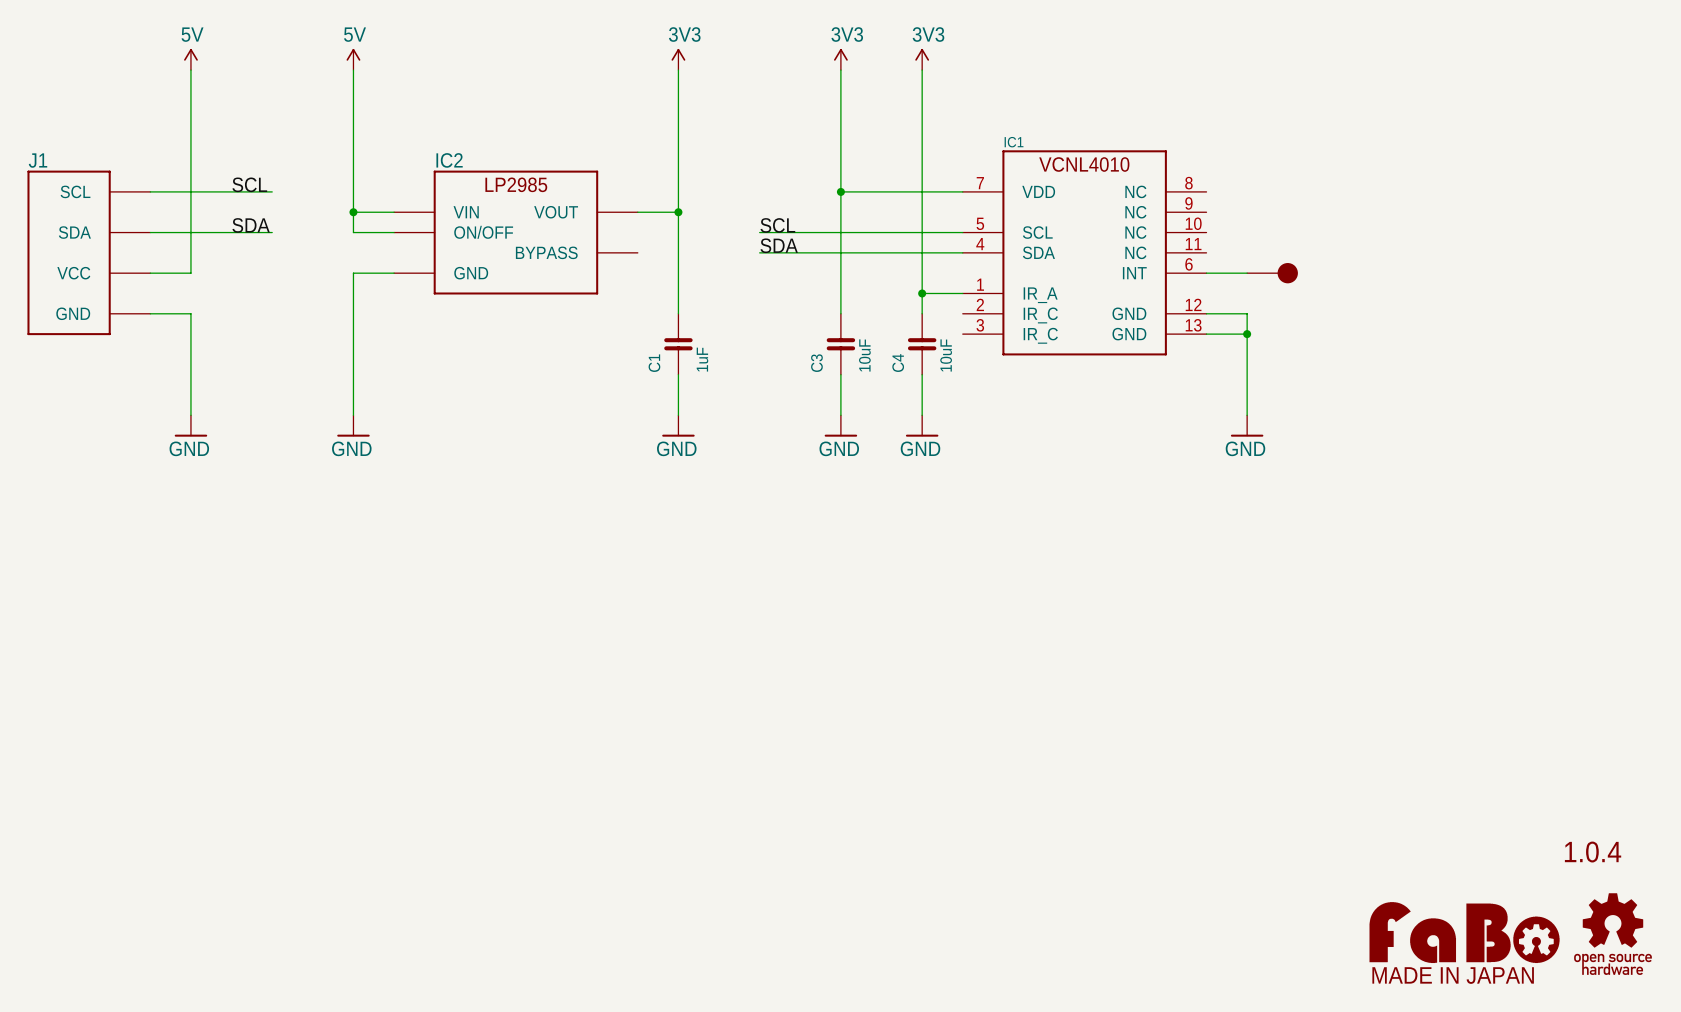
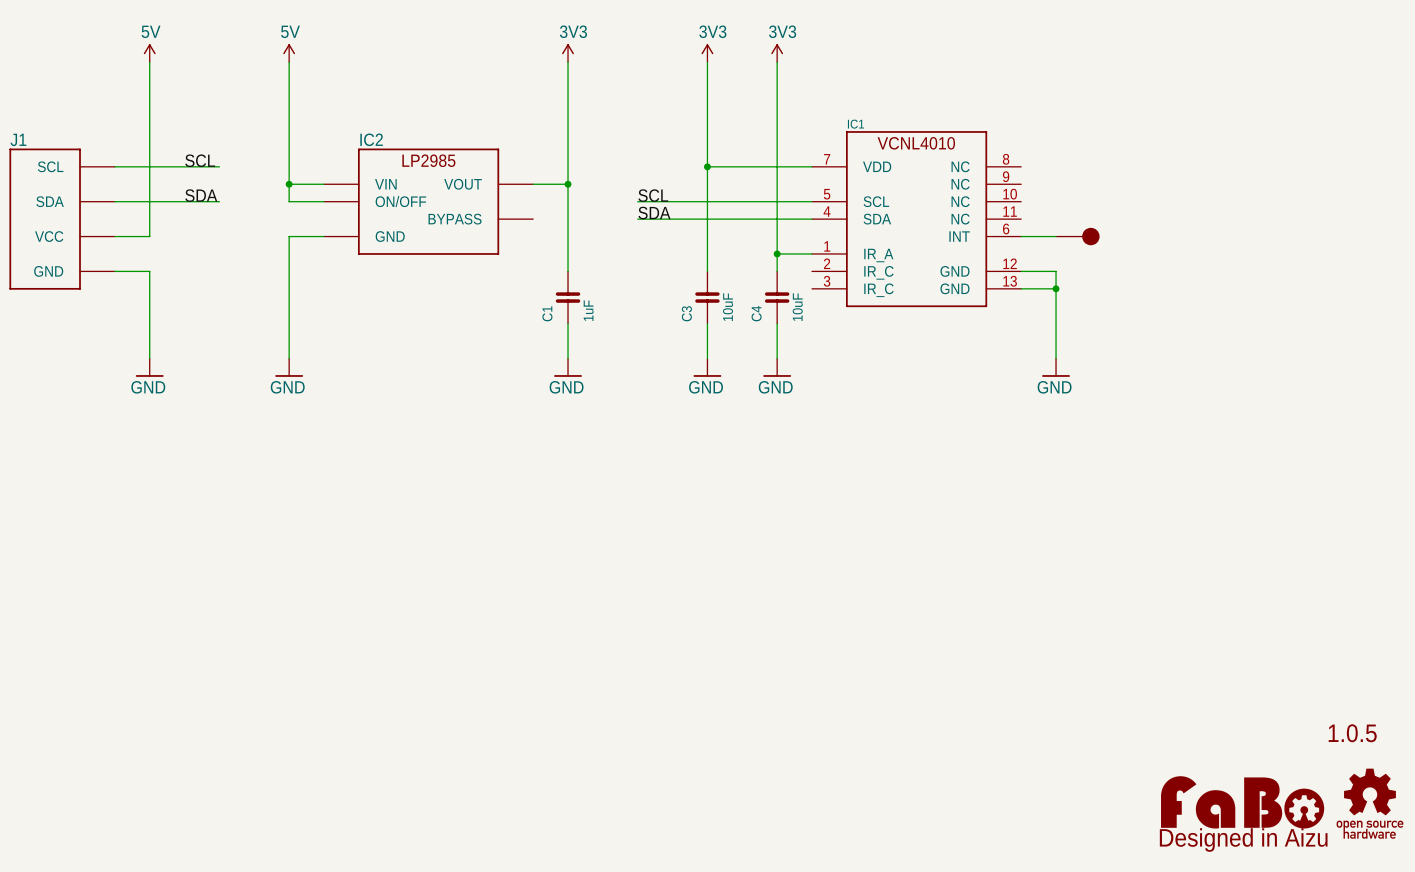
text: 1.0.4 (1593, 852) -> 1.0.5 (1352, 733)
part text: MADE IN JAPAN (1453, 975) -> none
part text: none -> Designed in Aizu (1243, 840)

